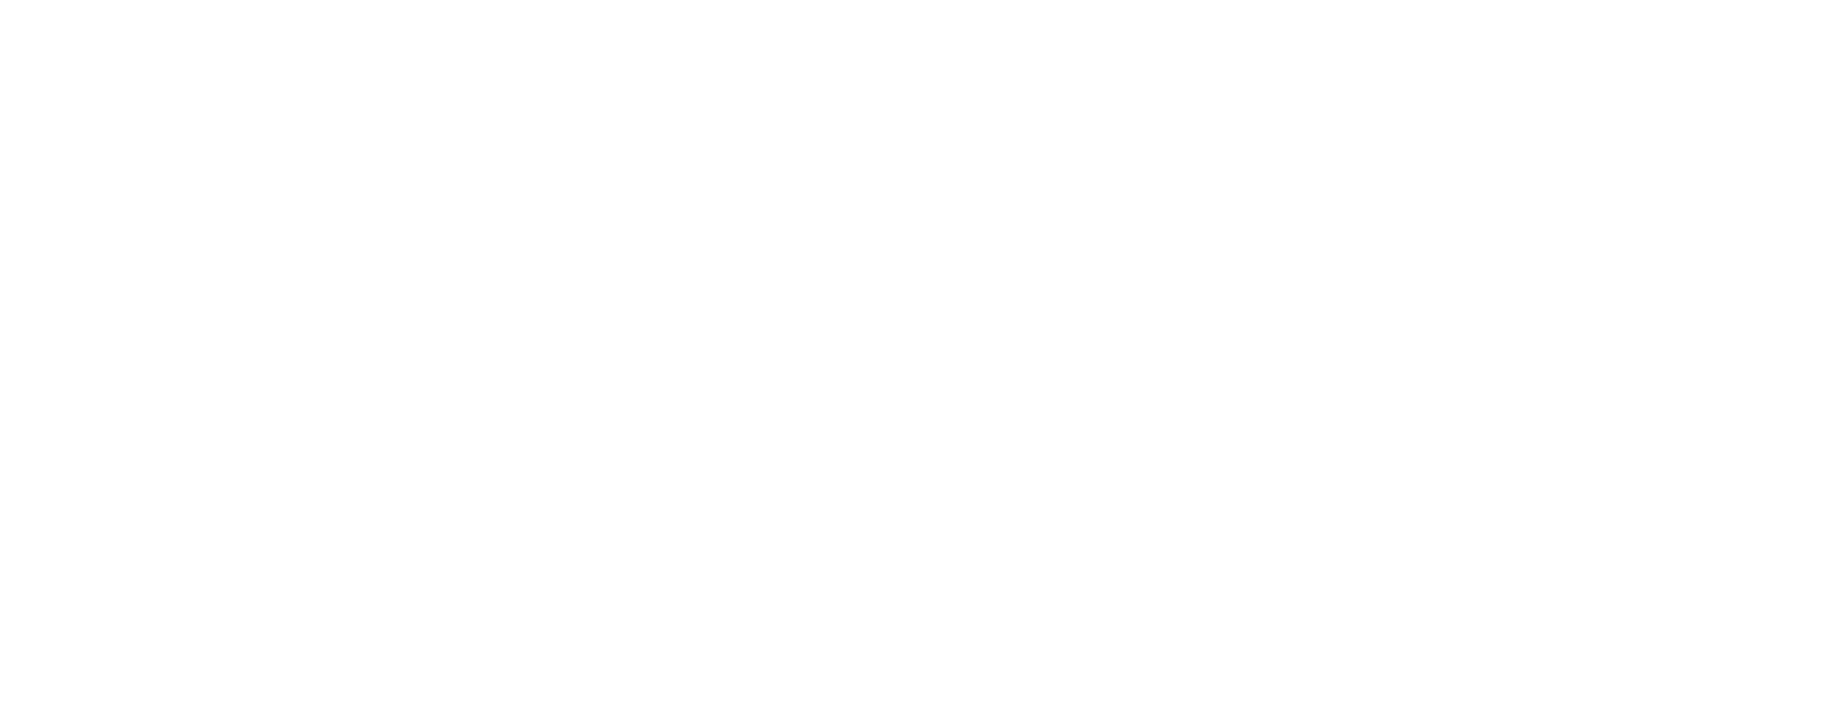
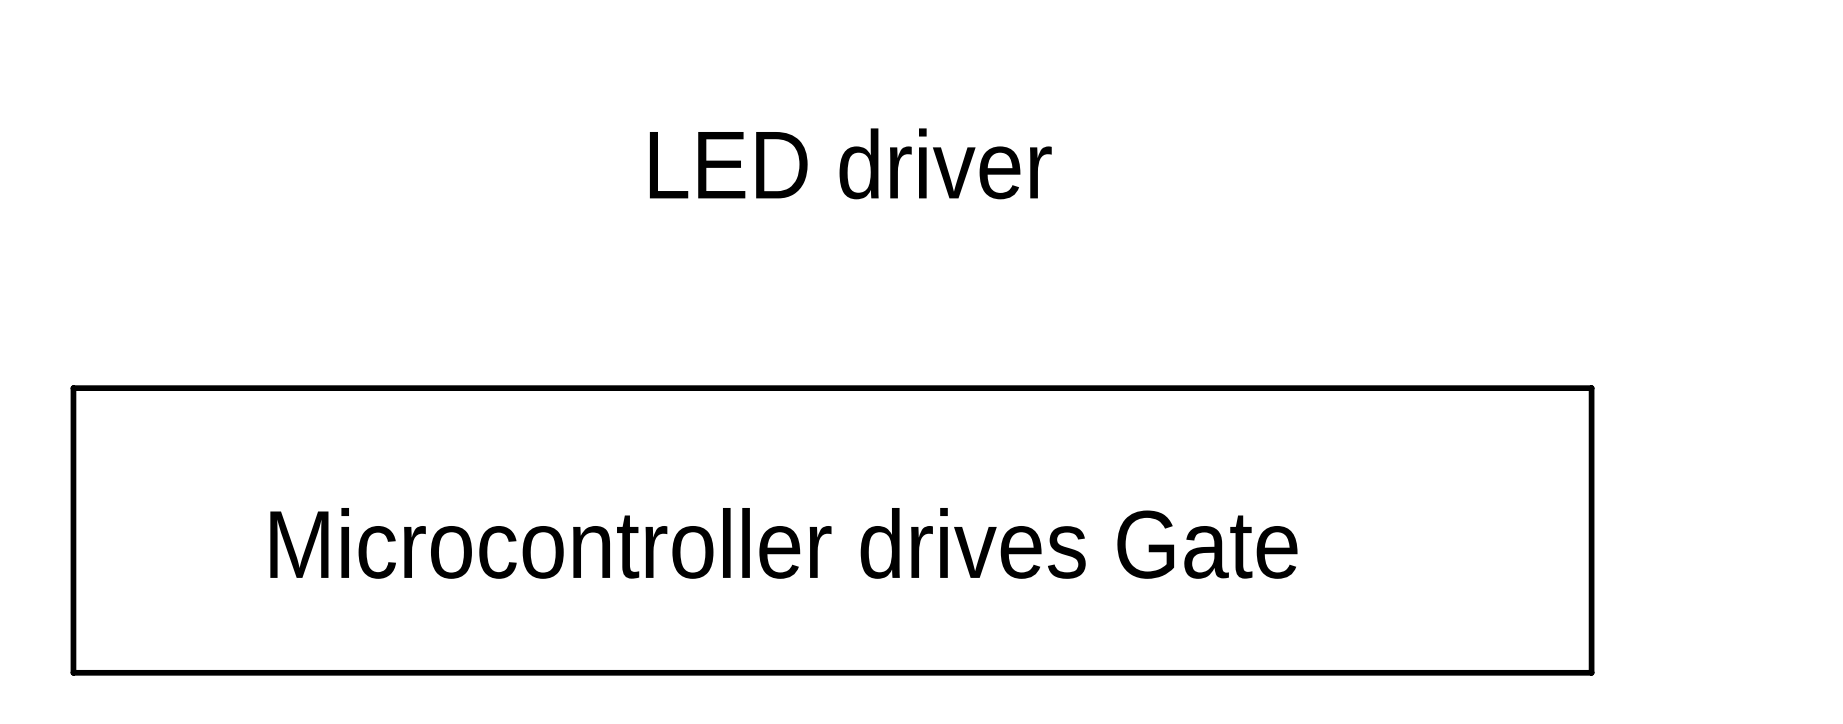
text: none -> LED driver (850, 163)
line: none -> (73, 388) (1591, 388) (1591, 672) (73, 672) (73, 388)
text: none -> Microcontroller drives Gate (783, 543)

